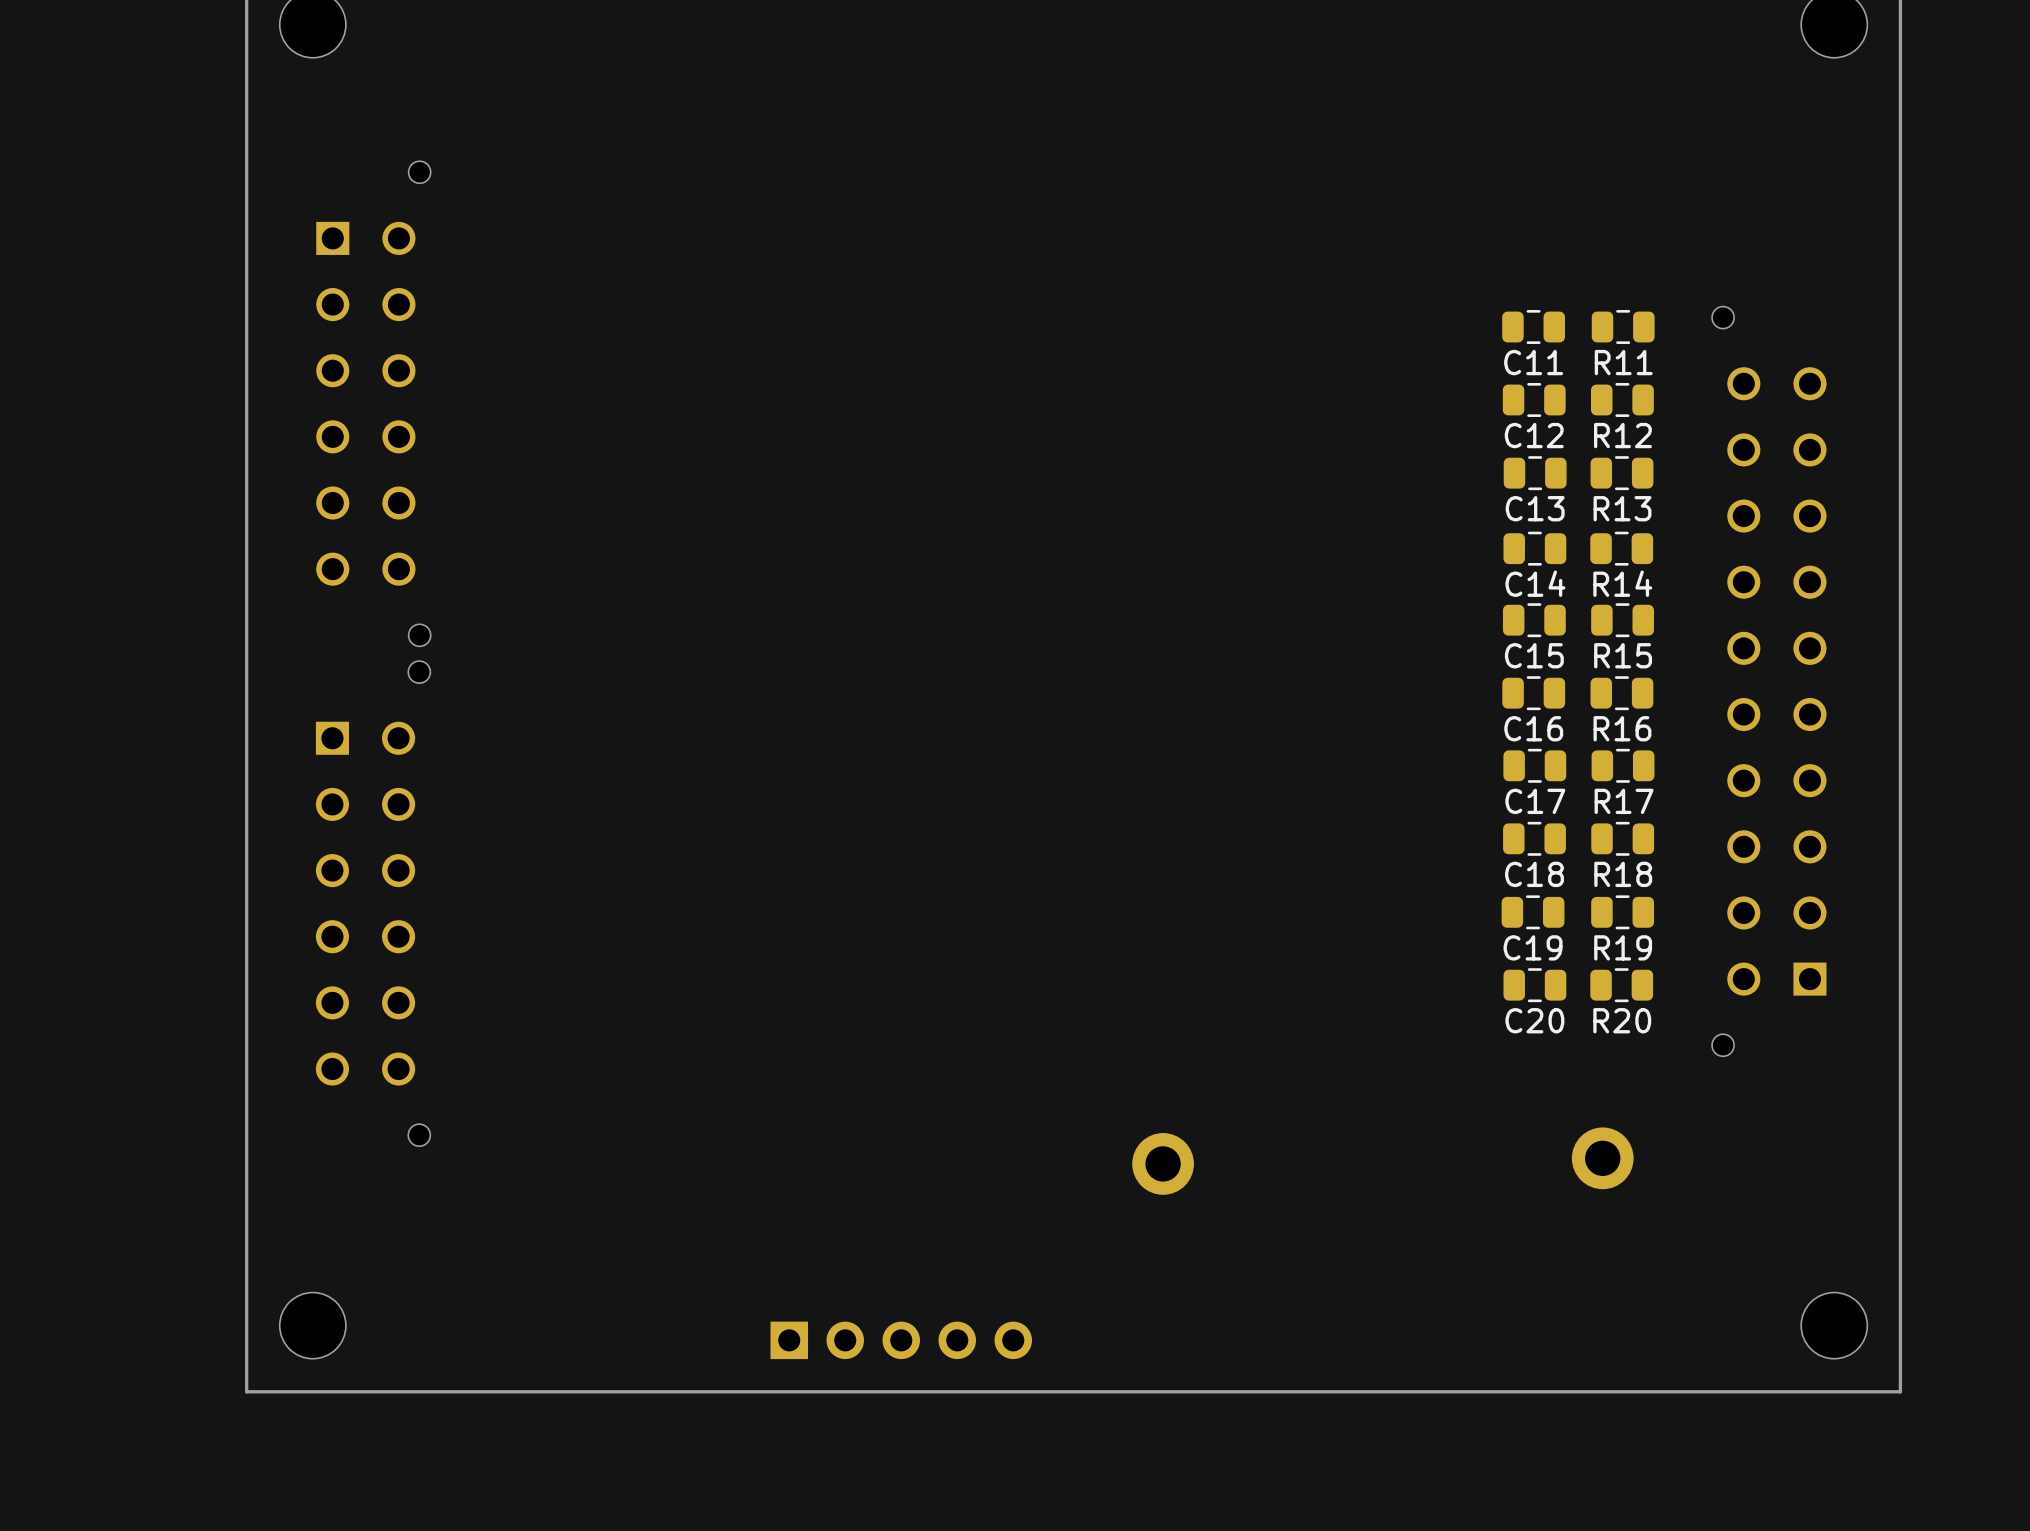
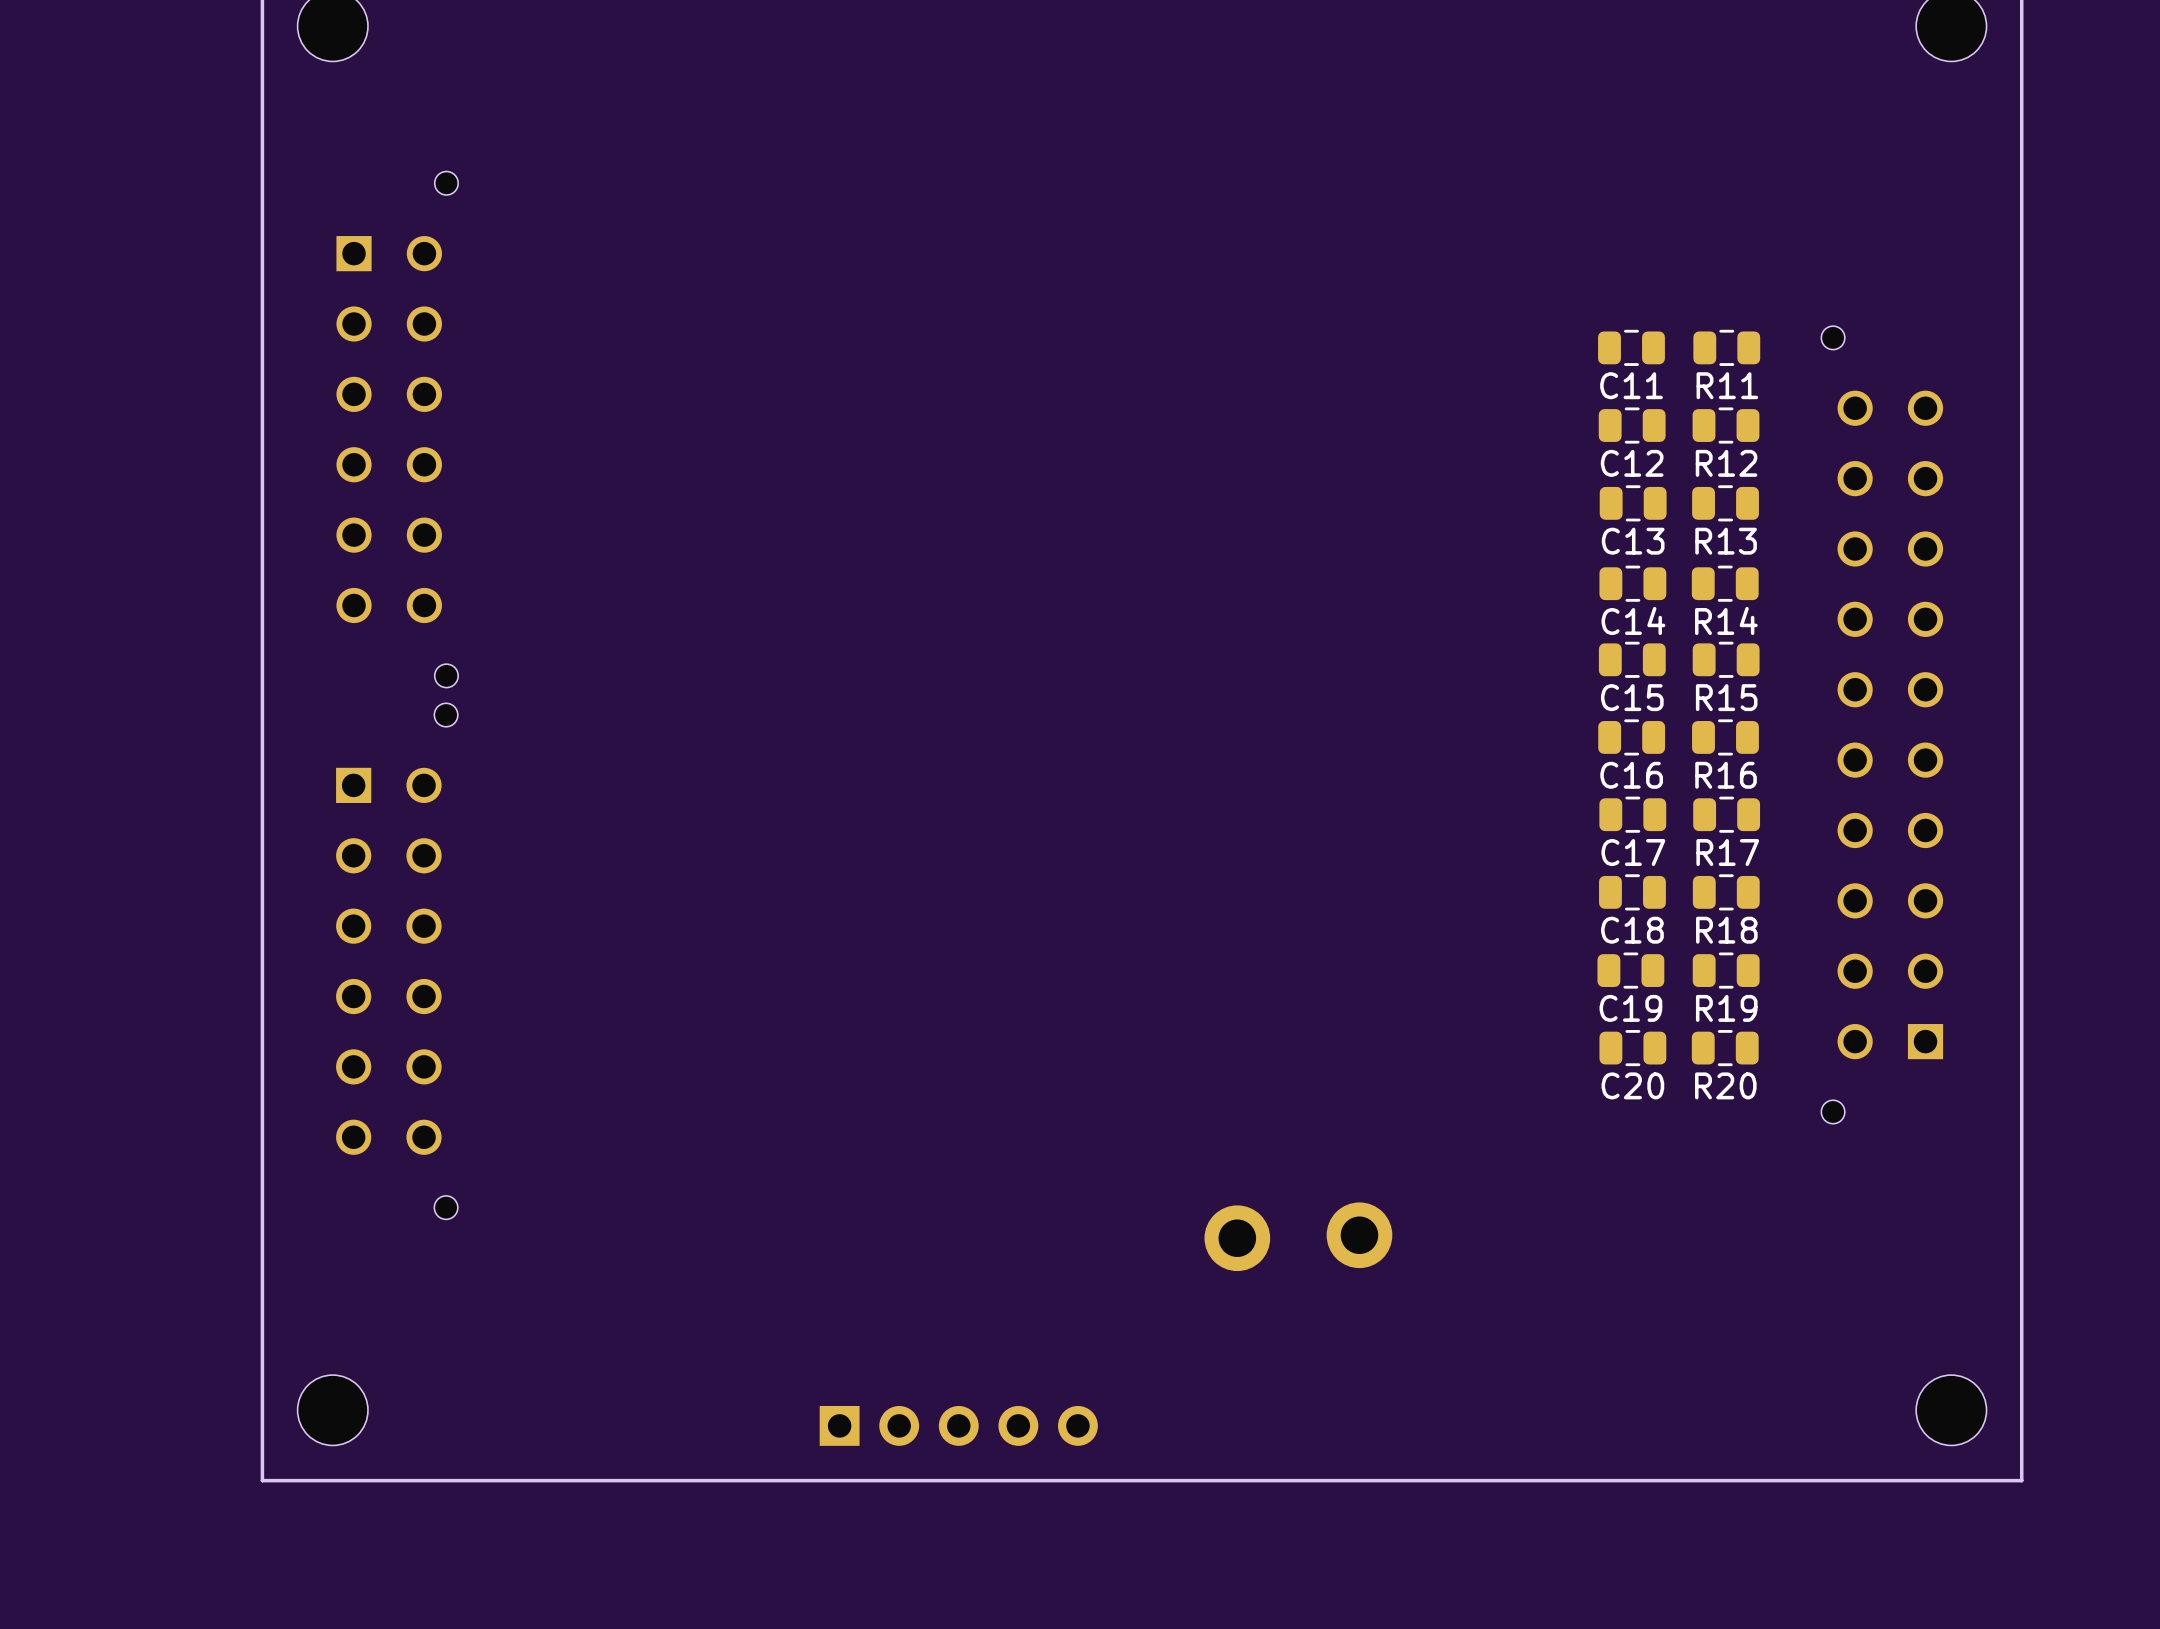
part position: (1602, 1158) -> (1359, 1235)

